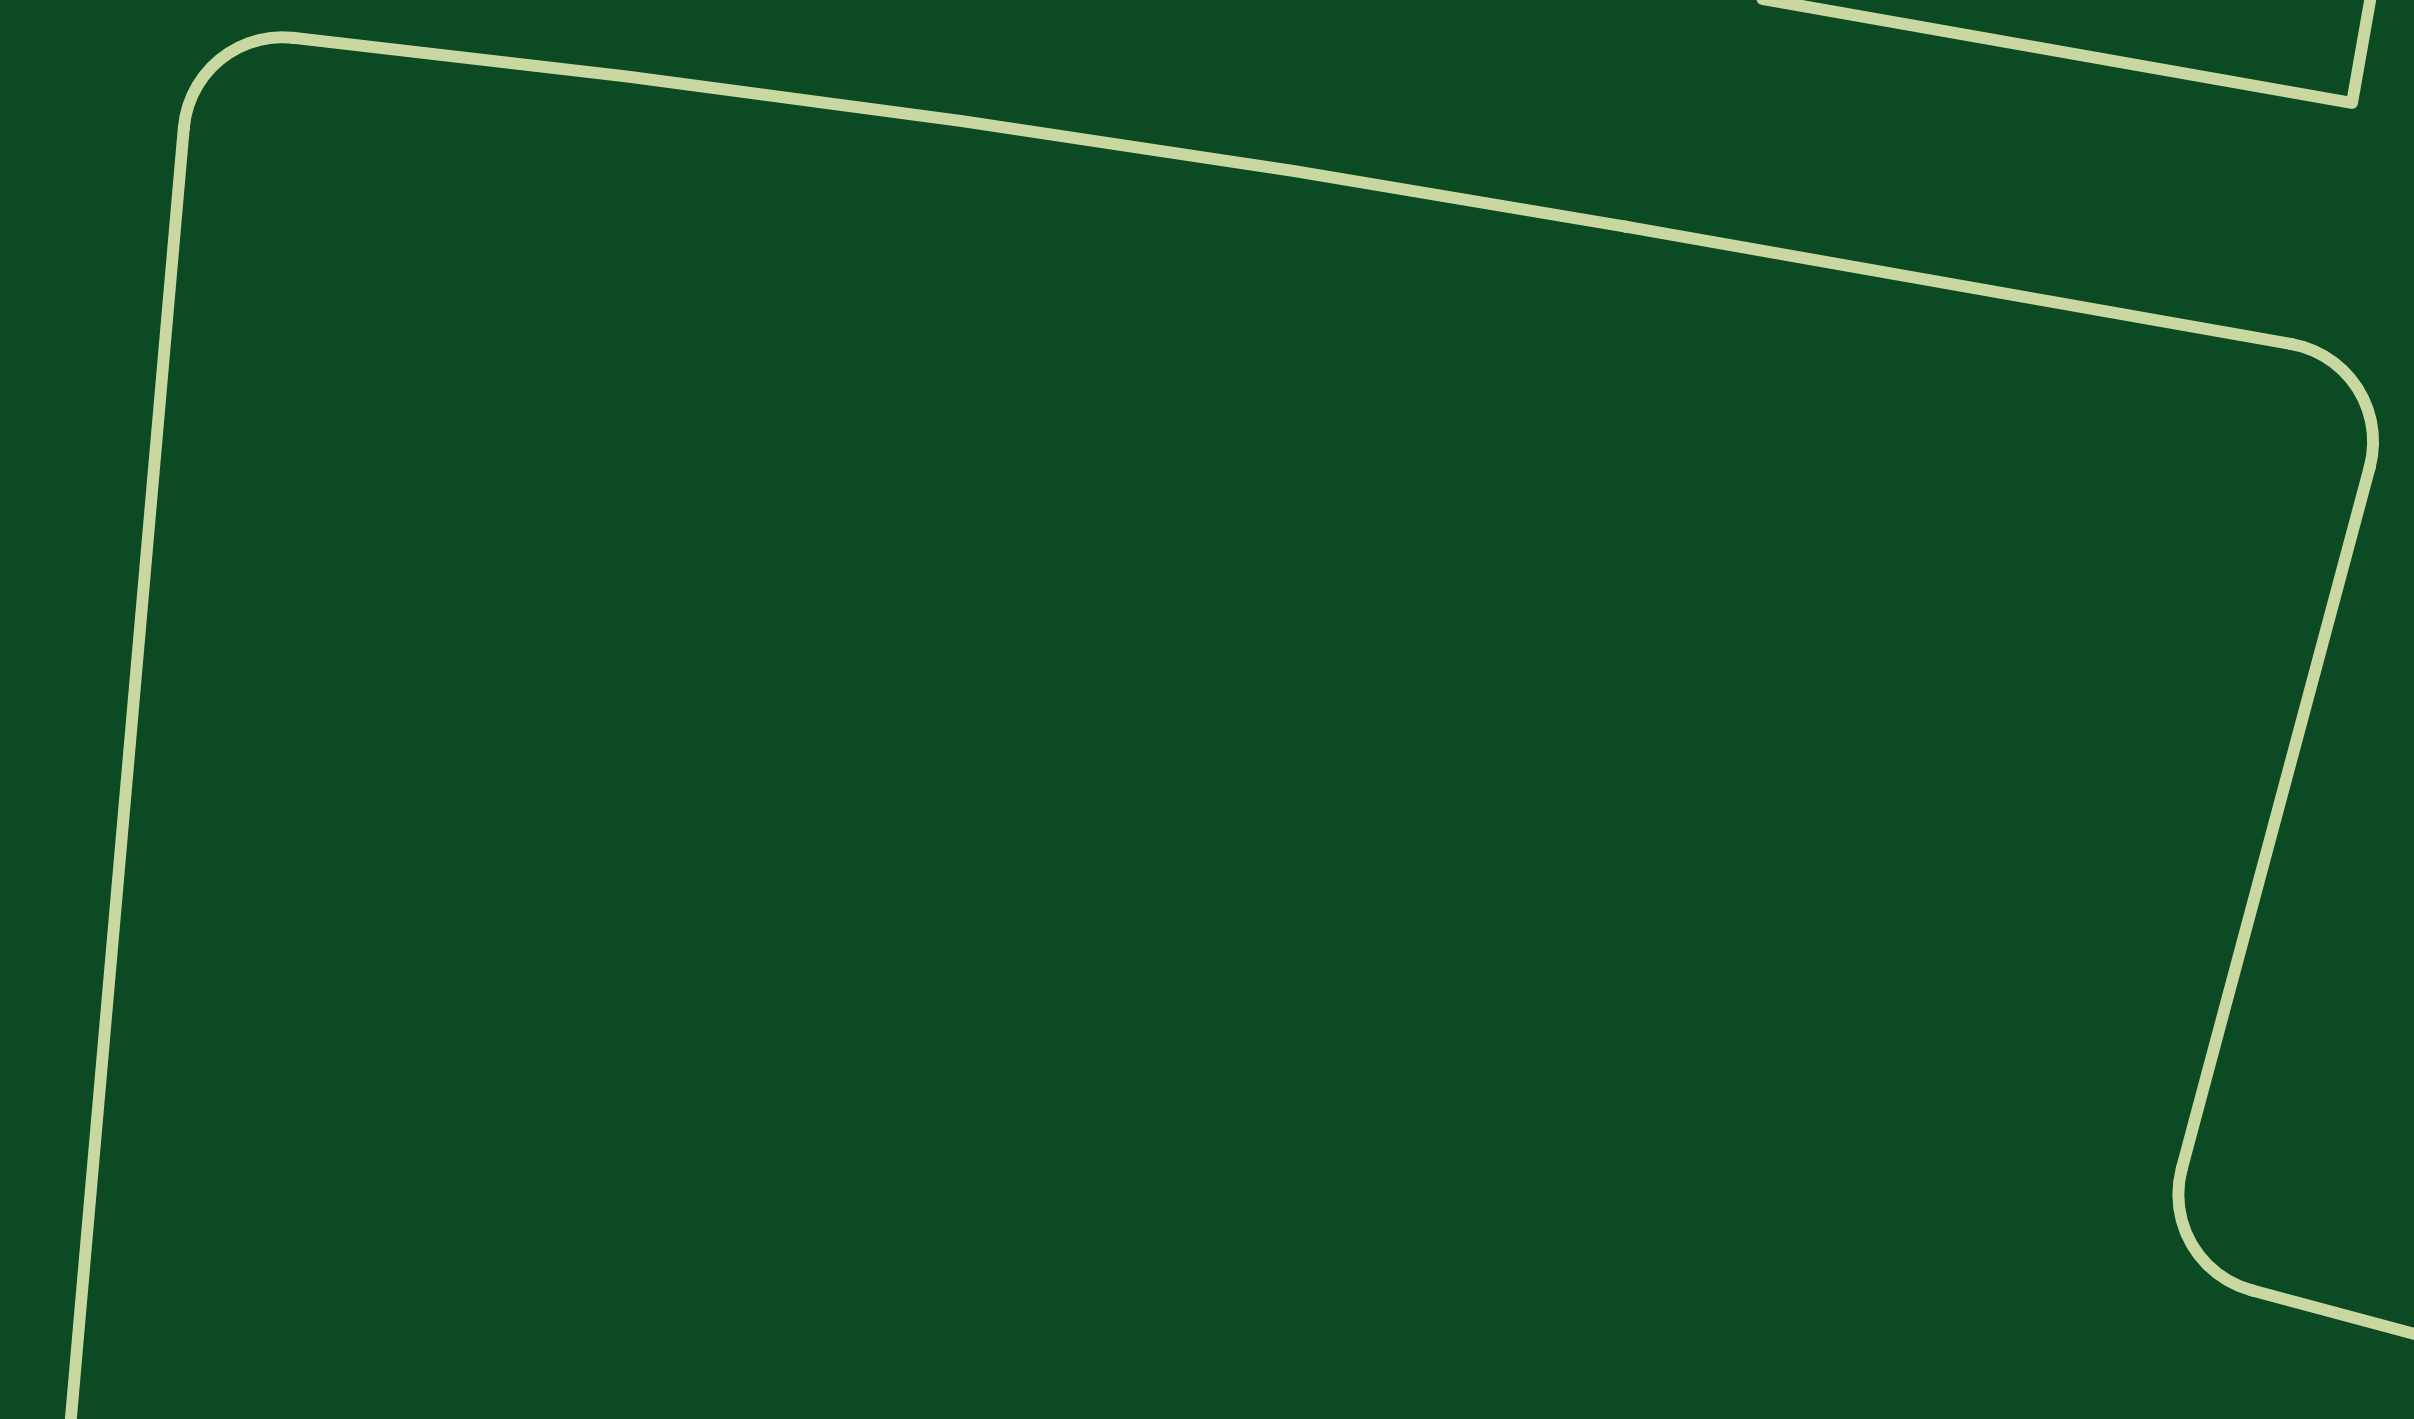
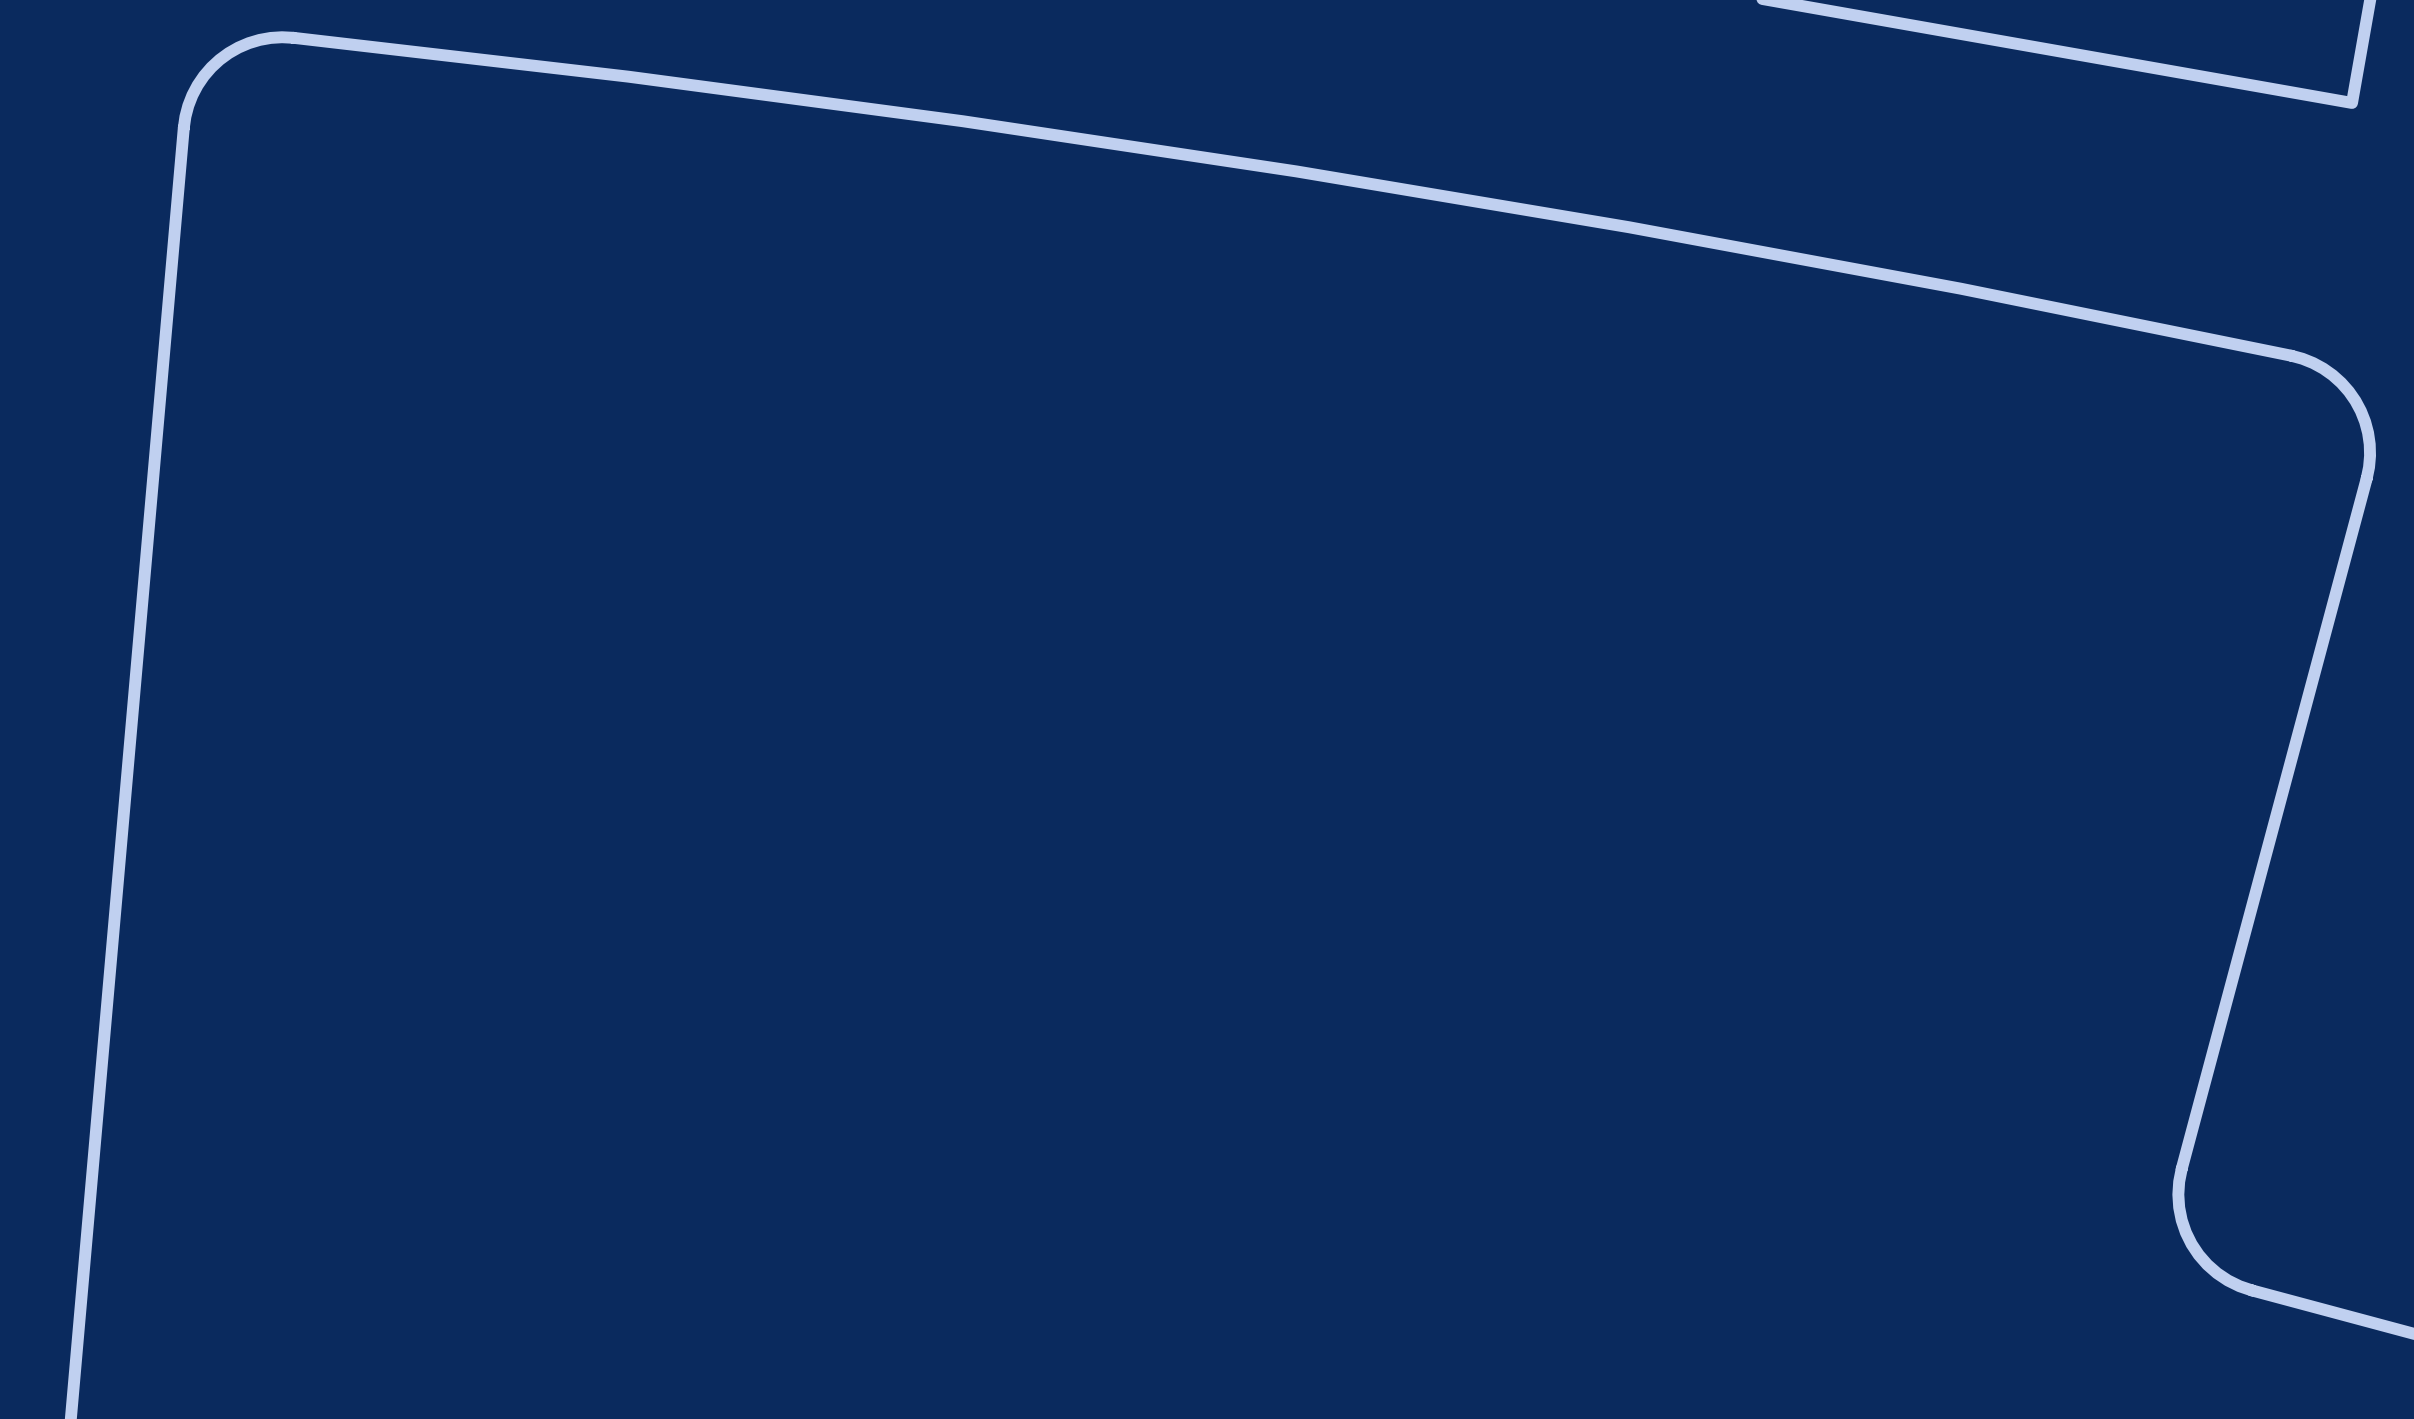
board edge: (293, 37) (627, 76) (960, 120) (1293, 170) (1625, 226) (2291, 343) (2313, 350) (2333, 362) (2357, 388) (2367, 409) (2372, 432) (2372, 455) (2366, 478) -> (293, 37) (628, 76) (962, 121) (1296, 171) (1629, 227) (1960, 288) (2291, 355) (2323, 368) (2341, 382) (2355, 400) (2368, 432) (2370, 455) (2366, 478)

